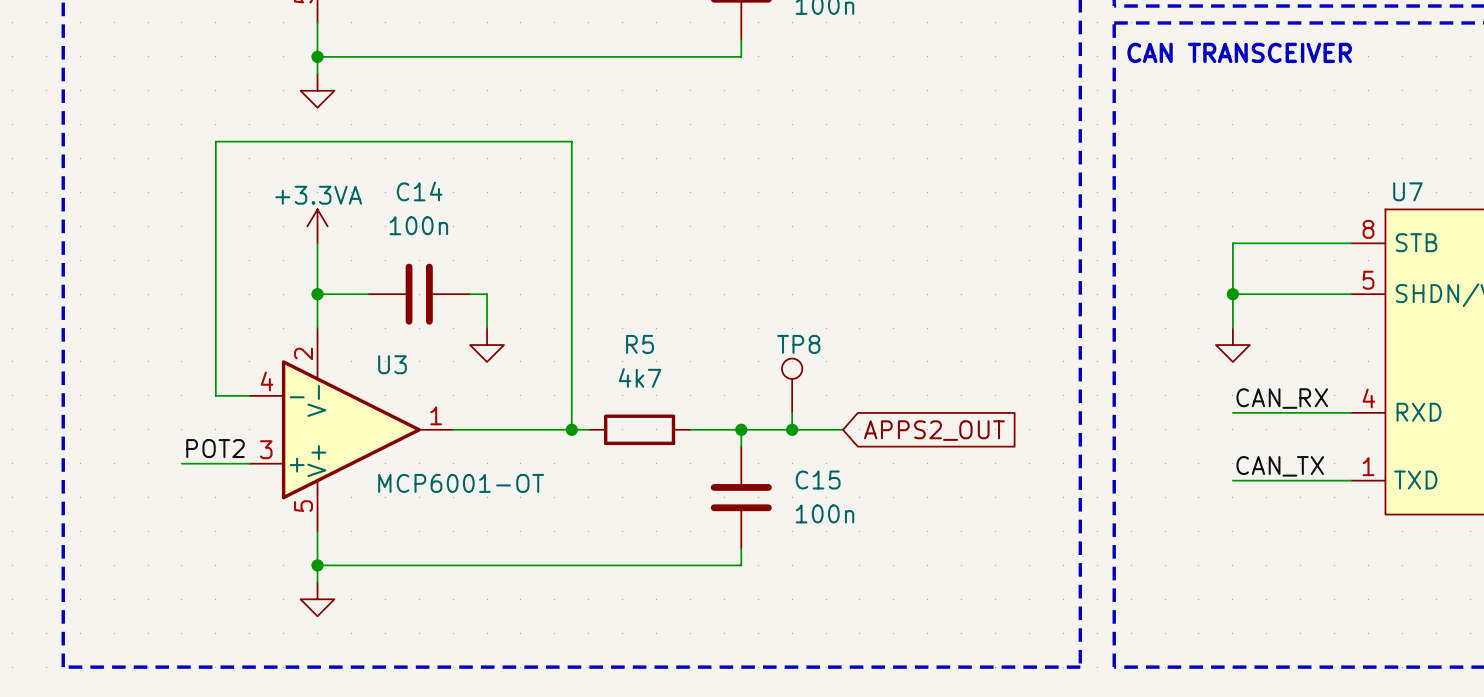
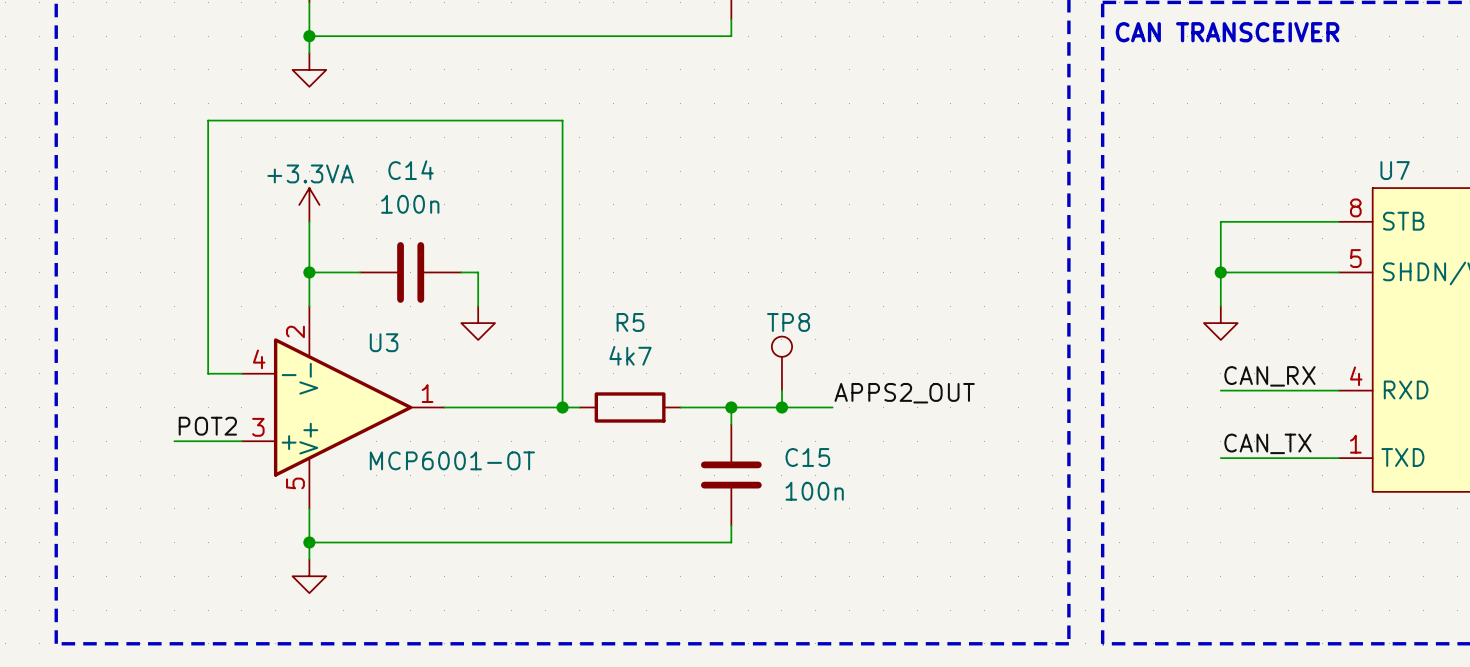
label: none -> APPS2_OUT (904, 393)
global label: APPS2_OUT (934, 430) -> none

